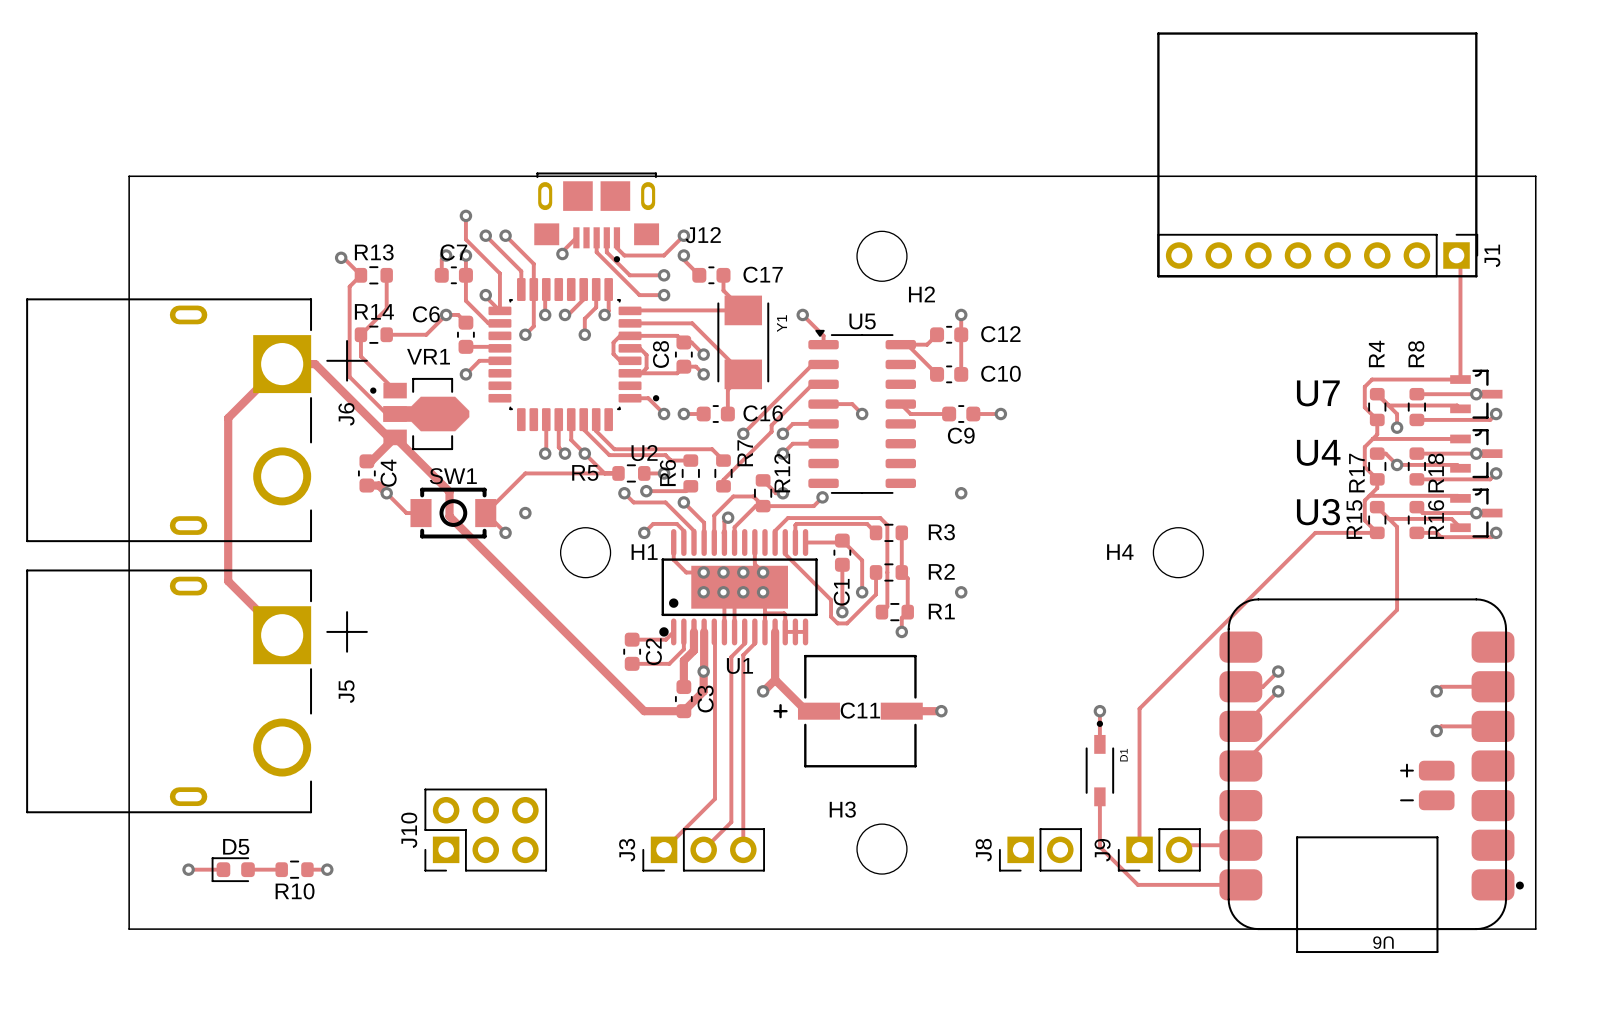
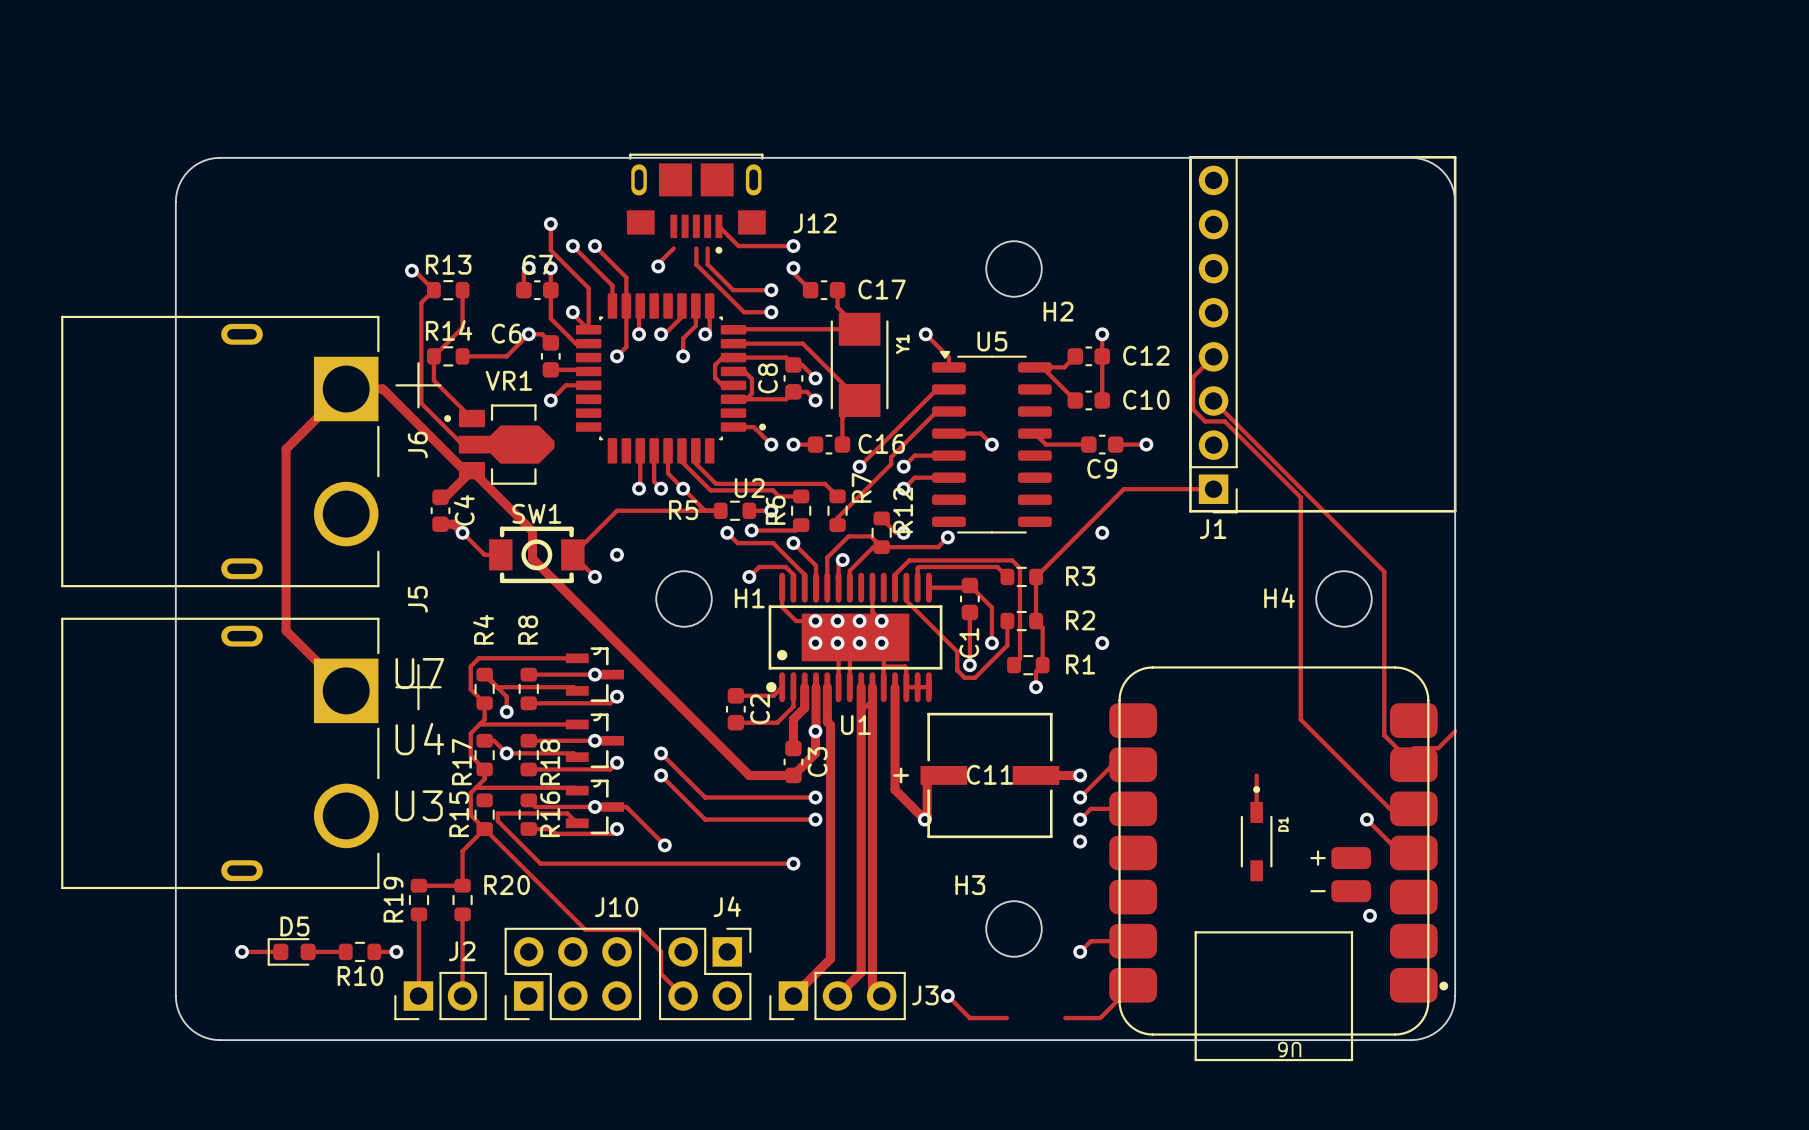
line: (1158, 33) (1476, 33) (1476, 276) (1158, 276) (1158, 33) -> none
line: none -> (1190, 157) (1455, 157) (1455, 511) (1190, 511) (1190, 157)
board edge: (129, 196) (129, 176) (1535, 176) (1535, 929) (129, 929) (129, 909) -> (175, 201) (179, 185) (188, 170) (203, 161) (219, 157) (1411, 157) (1427, 161) (1442, 170) (1451, 185) (1455, 201) (1455, 996) (1453, 1007) (1449, 1018) (1442, 1027) (1433, 1034) (1422, 1038) (1411, 1040) (219, 1040) (203, 1036) (188, 1027) (179, 1012) (175, 996)
J12 position: (596, 217) -> (696, 203)
track: (683, 235) (664, 255) (624, 255) (616, 248) (616, 237) -> (793, 246) (738, 246) (718, 226)
J1 rotation: 0° (1317, 255) -> 90° clockwise (1213, 334)
J1 position: (1317, 255) -> (1213, 334)
track: (1456, 255) (1460, 259) (1460, 379) (1372, 379) (1364, 386) (1364, 407) (1377, 419) (1377, 434) (1364, 447) (1364, 466) (1377, 479) (1377, 488) (1364, 500) (1364, 520) (1377, 532) (1315, 532) (1139, 708) (1139, 849) -> none
track: none -> (1213, 356) (1193, 377) (1193, 409) (1205, 421) (1224, 421) (1300, 497) (1300, 719) (1389, 808) (1413, 808)
track: none -> (1213, 400) (1384, 571) (1384, 735) (1413, 764)
track: (1377, 394) (1397, 414) (1397, 427) -> none
track: (1416, 394) (1492, 394) -> none
U7 position: (1476, 394) -> (594, 674)
via: (1476, 394) -> none
track: (1388, 405) (1457, 405) (1460, 408) -> none
R4 position: (1377, 407) -> (484, 688)
R8 position: (1416, 407) -> (528, 688)
track: (1496, 414) (1490, 419) (1416, 419) -> none
via: (1496, 414) -> none
via: (1397, 427) -> none
track: (1372, 438) (1460, 438) -> none
track: (1377, 453) (1385, 453) (1397, 464) (1457, 464) (1460, 468) -> none
track: (1416, 453) (1492, 453) -> none
U4 position: (1476, 453) -> (594, 740)
via: (1476, 453) -> none
track: none -> (1213, 489) (1123, 489) (1036, 576)
via: (1397, 464) -> none
R17 position: (1377, 466) -> (484, 755)
R18 position: (1416, 466) -> (528, 755)
track: (1496, 473) (1490, 479) (1416, 479) -> none
via: (1496, 473) -> none
track: (1369, 495) (1457, 495) (1460, 498) -> none
track: (1377, 507) (1397, 526) (1397, 609) (1240, 766) -> none
track: (1416, 507) (1422, 513) (1492, 513) -> none
U3 position: (1476, 513) -> (594, 806)
via: (1476, 513) -> none
track: (1389, 518) (1451, 518) (1460, 527) -> none
R15 position: (1377, 520) -> (484, 814)
R16 position: (1416, 520) -> (528, 814)
track: (1416, 532) (1436, 532) (1440, 537) (1491, 537) (1496, 532) -> none
via: (1496, 532) -> none
track: none -> (577, 658) (478, 658) (470, 666) (470, 689) (484, 703) (484, 719) (470, 733) (470, 755) (484, 769) (484, 779) (470, 793) (470, 815) (585, 929) (639, 929) (661, 951) (661, 973) (683, 996)
track: none -> (484, 674) (506, 696) (506, 711)
track: none -> (528, 674) (612, 674)
via: none -> (594, 674)
track: none -> (497, 687) (573, 687) (577, 690)
track: none -> (827, 687) (827, 721) (830, 725) (830, 958) (793, 996)
track: none -> (861, 687) (861, 972) (837, 996)
track: none -> (872, 687) (872, 986) (881, 996)
track: (714, 632) (714, 798) (664, 849) -> none
track: none -> (616, 696) (610, 703) (528, 703)
via: none -> (616, 696)
track: (744, 643) (731, 656) (731, 822) (703, 849) -> none
via: none -> (506, 711)
track: none -> (479, 724) (577, 724)
via: (1278, 671) -> none
track: none -> (895, 740) (895, 789) (924, 819) (927, 817) (927, 778) (929, 775)
track: none -> (484, 740) (494, 740) (506, 753) (573, 753) (577, 757)
track: none -> (528, 740) (612, 740)
via: none -> (594, 740)
track: (1493, 686) (1441, 686) (1436, 691) -> none
J5 name position: J5 (346, 691) -> J5 (417, 599)
via: none -> (506, 753)
track: none -> (661, 753) (705, 797) (815, 797)
via: none -> (661, 753)
track: (763, 691) (775, 679) (806, 711) (818, 711) -> none
via: (763, 691) -> none
track: (1278, 691) (1243, 726) (1240, 726) -> none
via: (1278, 691) -> none
via: (1436, 691) -> none
track: none -> (616, 762) (610, 769) (528, 769)
via: none -> (616, 762)
track: none -> (1133, 764) (1112, 764) (1080, 797)
track: none -> (661, 775) (705, 819) (815, 819)
via: none -> (661, 775)
via: (1099, 711) -> none
track: none -> (475, 787) (574, 787) (577, 790)
track: (1493, 726) (1441, 726) (1436, 730) -> none
via: none -> (815, 797)
via: none -> (1080, 797)
via: (1436, 730) -> none
track: none -> (528, 800) (535, 806) (626, 806) (664, 845)
via: none -> (594, 806)
track: none -> (1133, 808) (1090, 808) (1080, 819)
via: none -> (815, 819)
via: none -> (924, 819)
via: none -> (1080, 819)
track: none -> (1366, 819) (1400, 852) (1413, 852)
via: none -> (1366, 819)
track: none -> (577, 823) (567, 813) (497, 813) (497, 820) (540, 863) (793, 863)
track: none -> (484, 829) (462, 851) (462, 885) (418, 885)
track: none -> (528, 829) (550, 829) (555, 833) (612, 833) (616, 829)
via: none -> (616, 829)
via: none -> (1080, 841)
via: none -> (664, 845)
U6 position: (1371, 775) -> (1278, 863)
via: none -> (793, 863)
track: (1099, 796) (1099, 846) (1137, 884) (1240, 884) -> none
R19: none -> (418, 900)
R20: none -> (462, 900)
J10 name rotation: 0° (409, 830) -> 90° clockwise (616, 907)
J10 name position: J10 (409, 830) -> J10 (616, 907)
J10 position: (485, 830) -> (572, 973)
track: none -> (418, 914) (418, 996)
track: none -> (462, 914) (462, 996)
via: none -> (1370, 915)
track: (1240, 845) (1183, 845) (1179, 849) -> none
J3 position: (703, 849) -> (837, 996)
J8: (1040, 849) -> none
J9: (1159, 849) -> none
J3 name rotation: 0° (627, 850) -> 90° clockwise (925, 995)
J3 name position: J3 (627, 850) -> J3 (925, 995)
track: none -> (1133, 941) (1090, 941) (1080, 951)
via: none -> (1080, 951)
J4: none -> (705, 973)
track: none -> (1133, 985) (1100, 1018) (1065, 1018)
J2: none -> (440, 996)
track: none -> (947, 996) (969, 1018) (1006, 1018)
via: none -> (947, 996)

